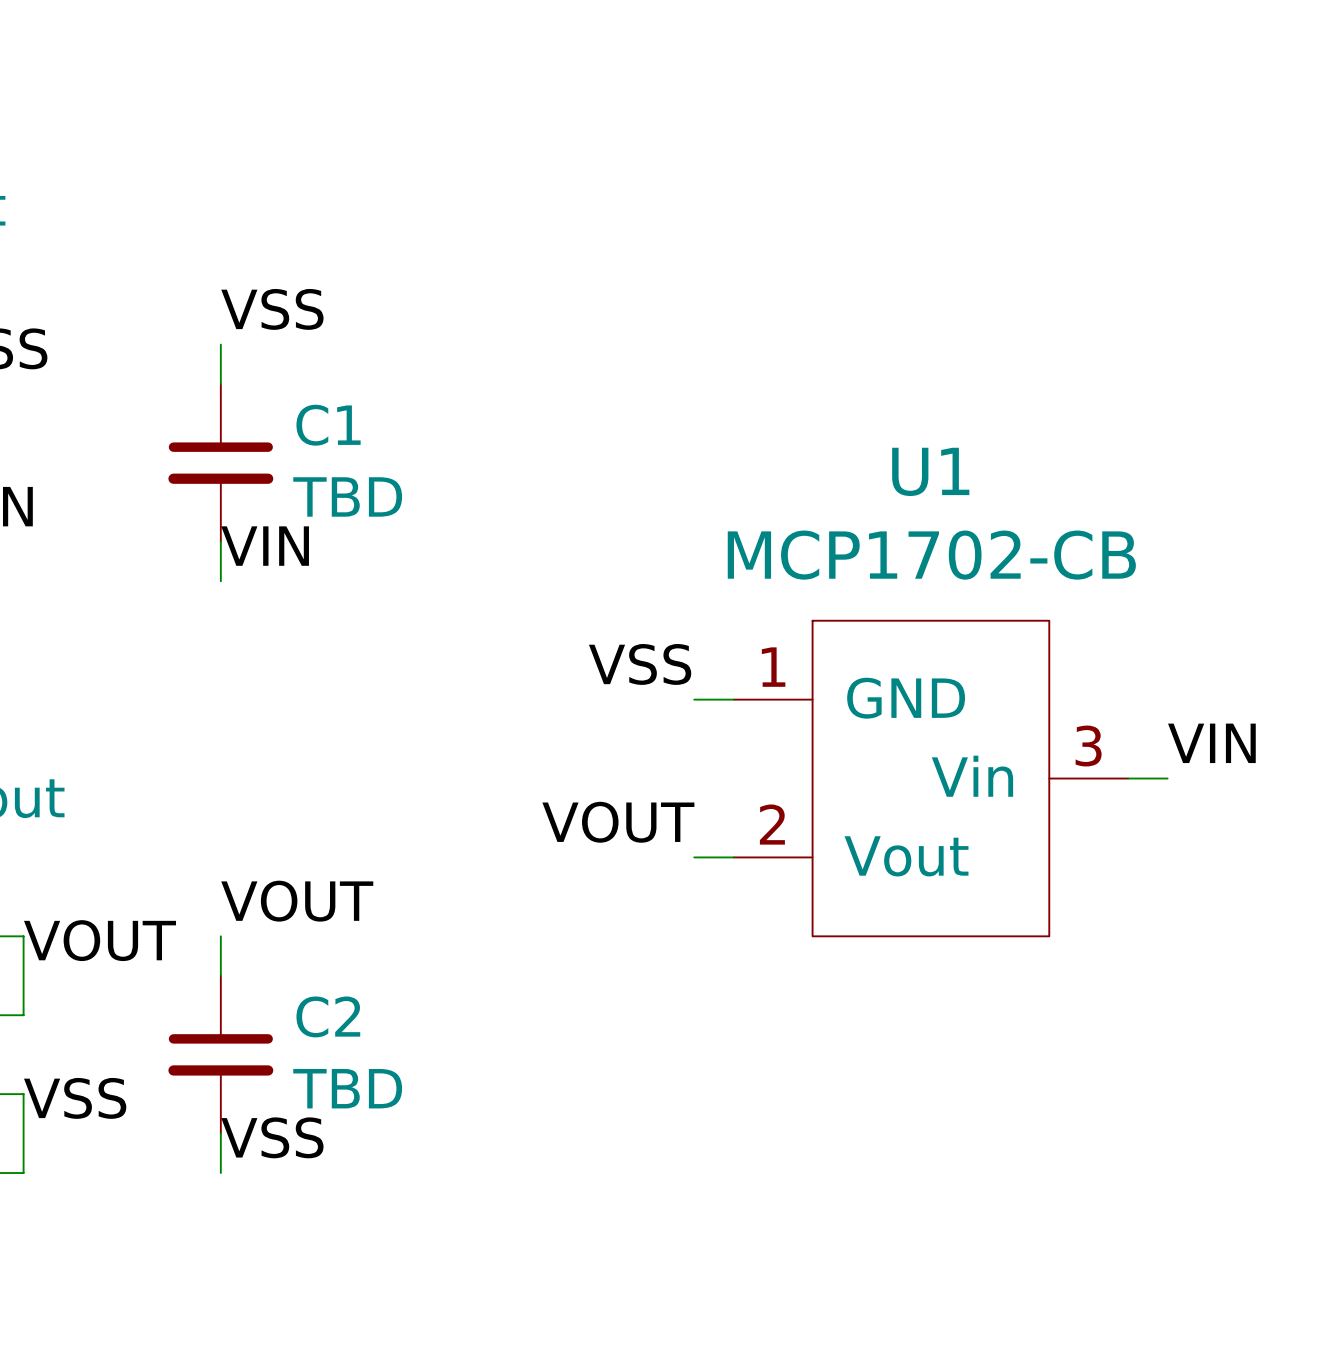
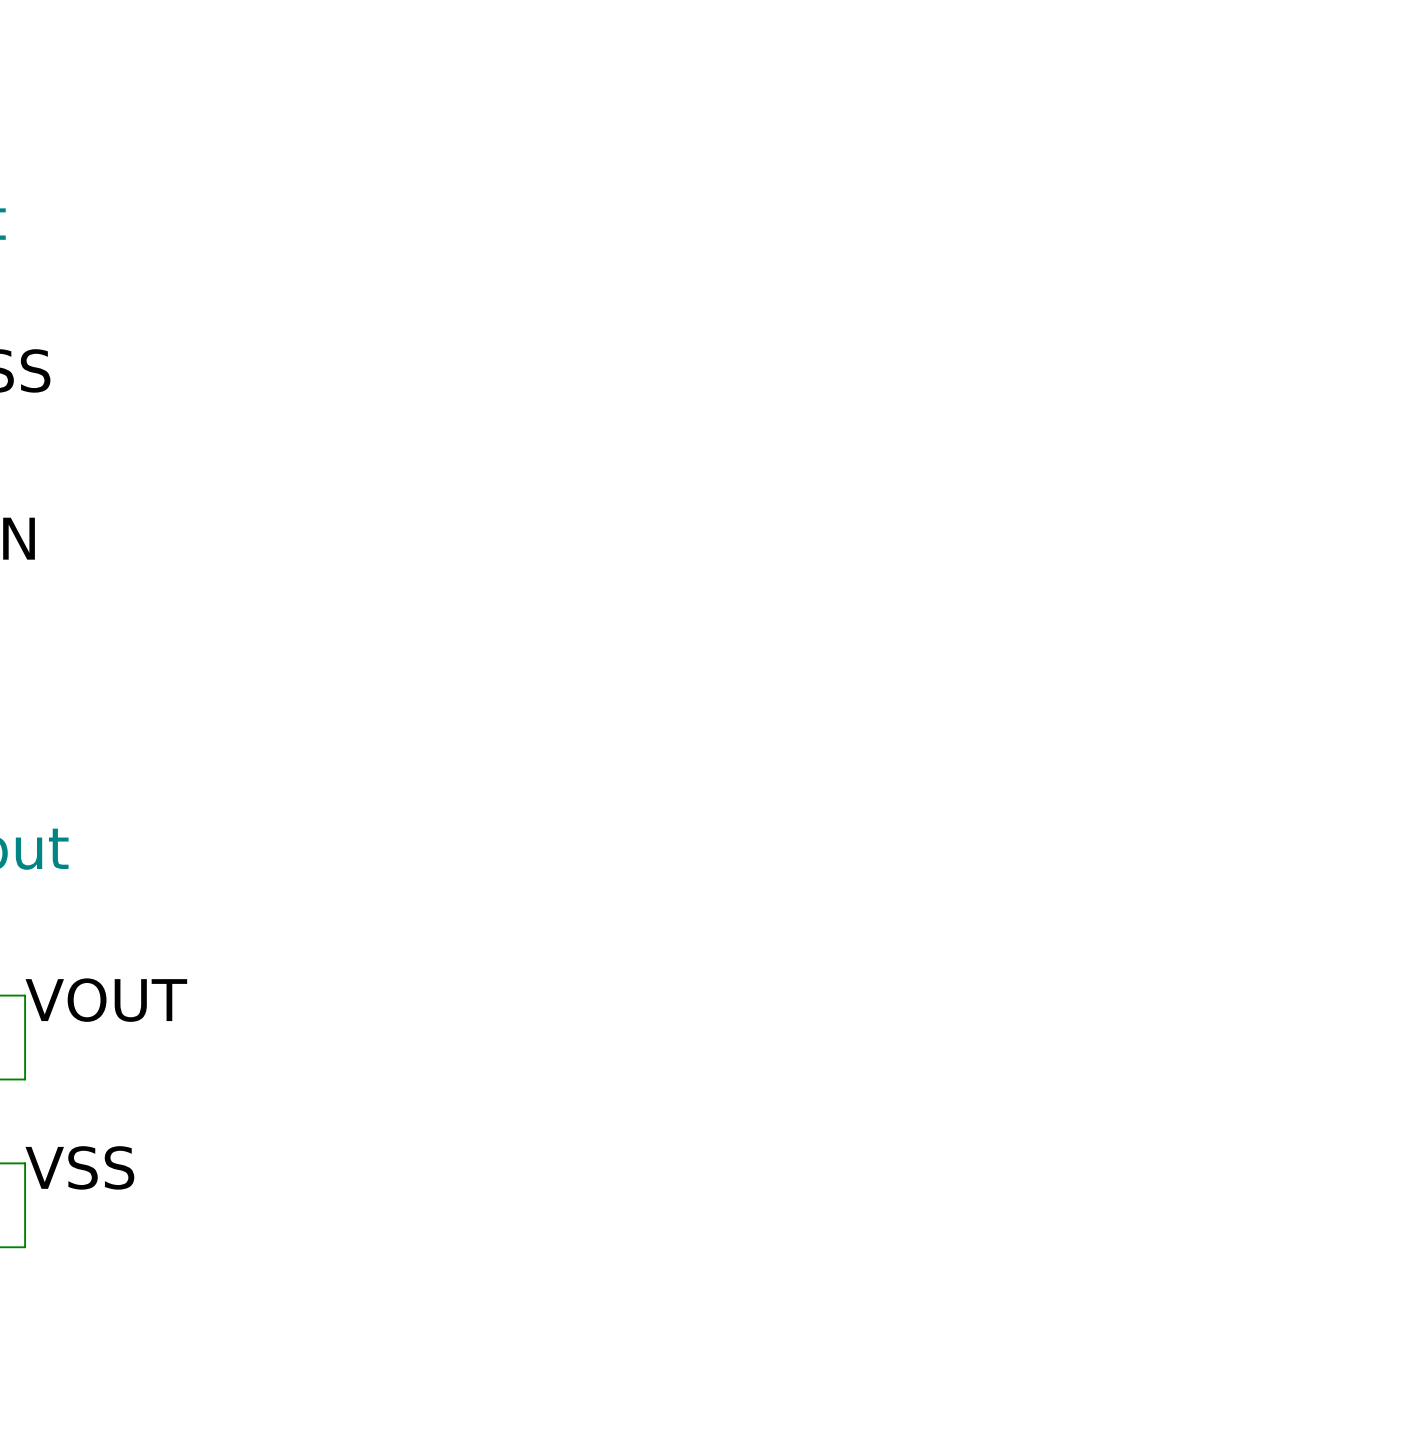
label: VSS (272, 309) -> none
wire: (220, 344) (220, 384) -> none
C1: TBD (220, 462) -> none
wire: (220, 541) (220, 581) -> none
label: VIN (265, 546) -> none
label: VSS (640, 664) -> none
wire: (694, 699) (733, 699) -> none
label: VIN (1211, 743) -> none
U1: MCP1702-CB (930, 778) -> none
wire: (1128, 778) (1167, 778) -> none
label: VOUT (618, 822) -> none
wire: (694, 857) (733, 857) -> none
label: VOUT (297, 901) -> none
wire: (220, 936) (220, 975) -> none
C2: TBD (220, 1054) -> none
wire: (220, 1133) (220, 1173) -> none
label: VSS (272, 1137) -> none

